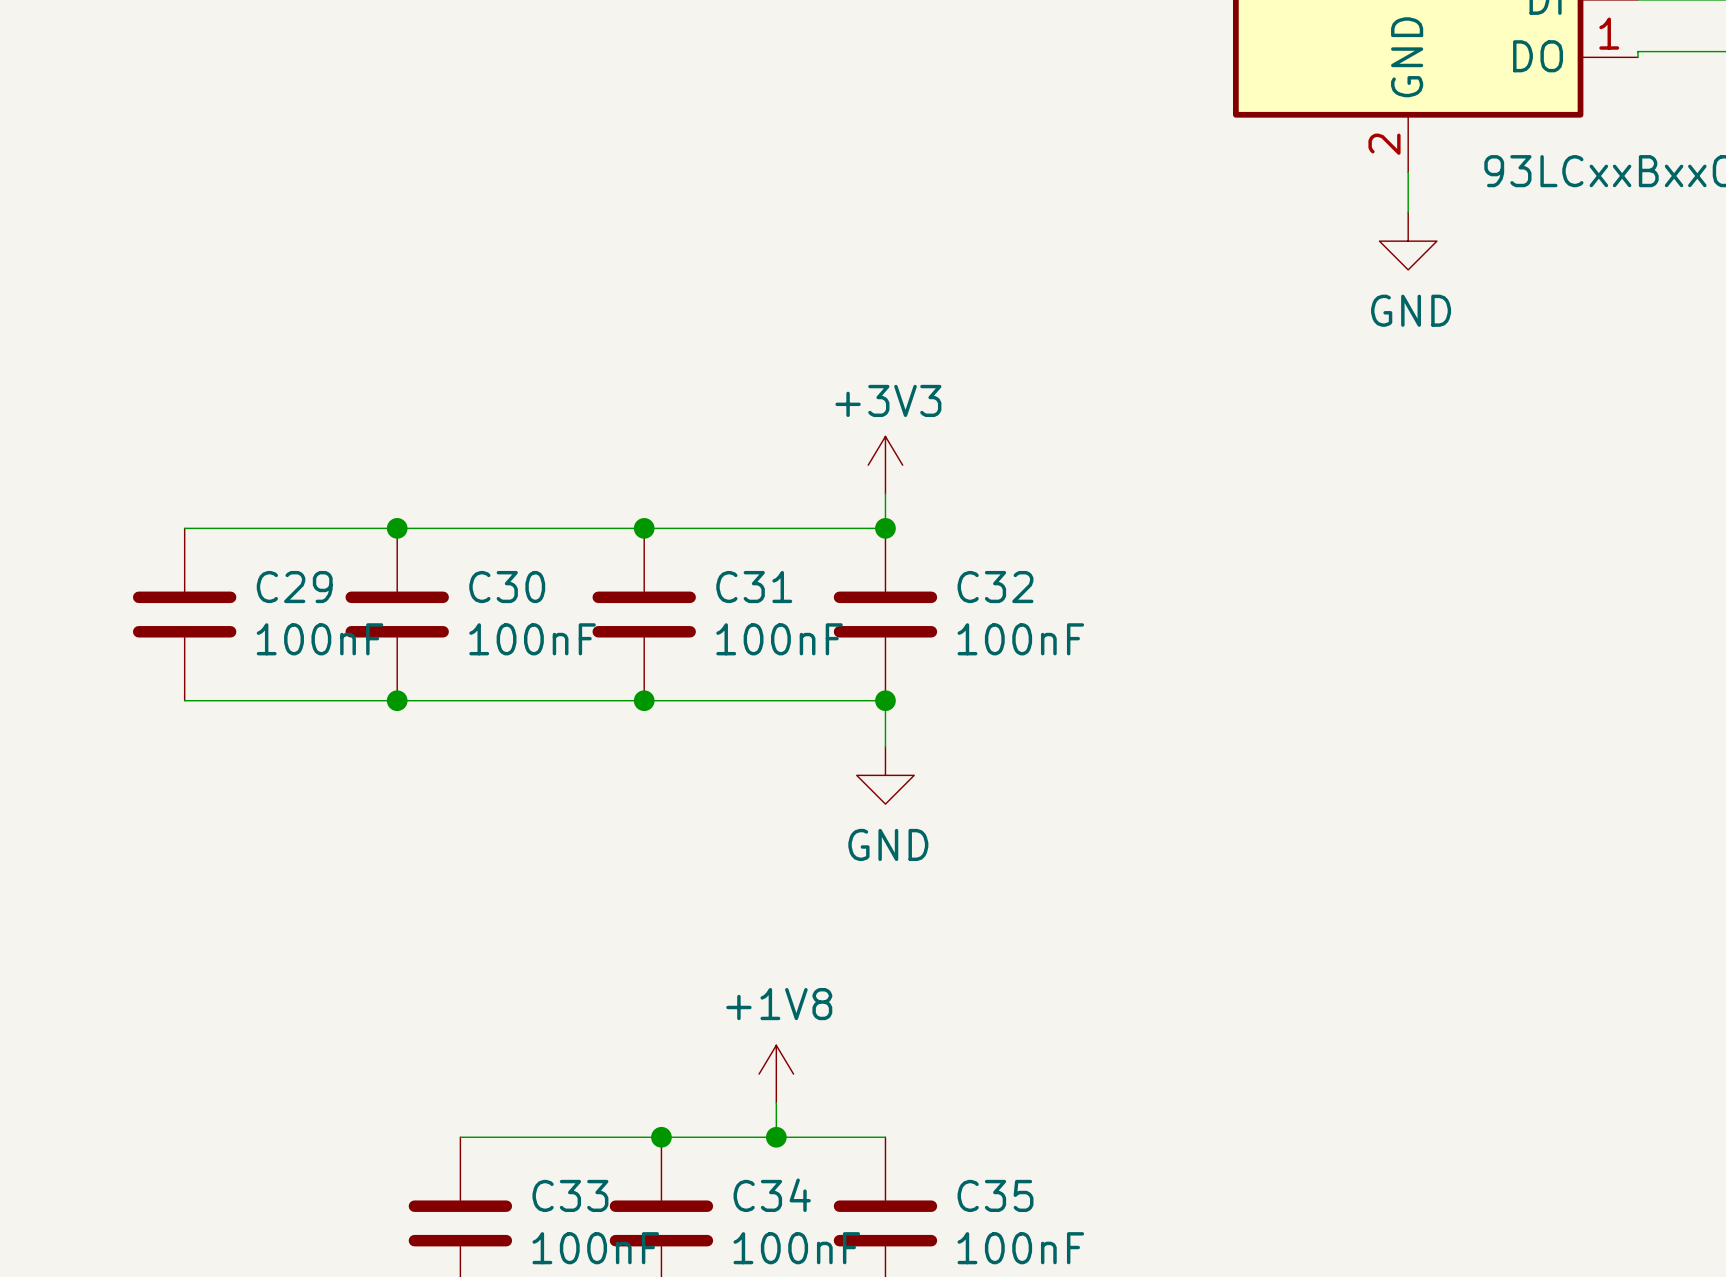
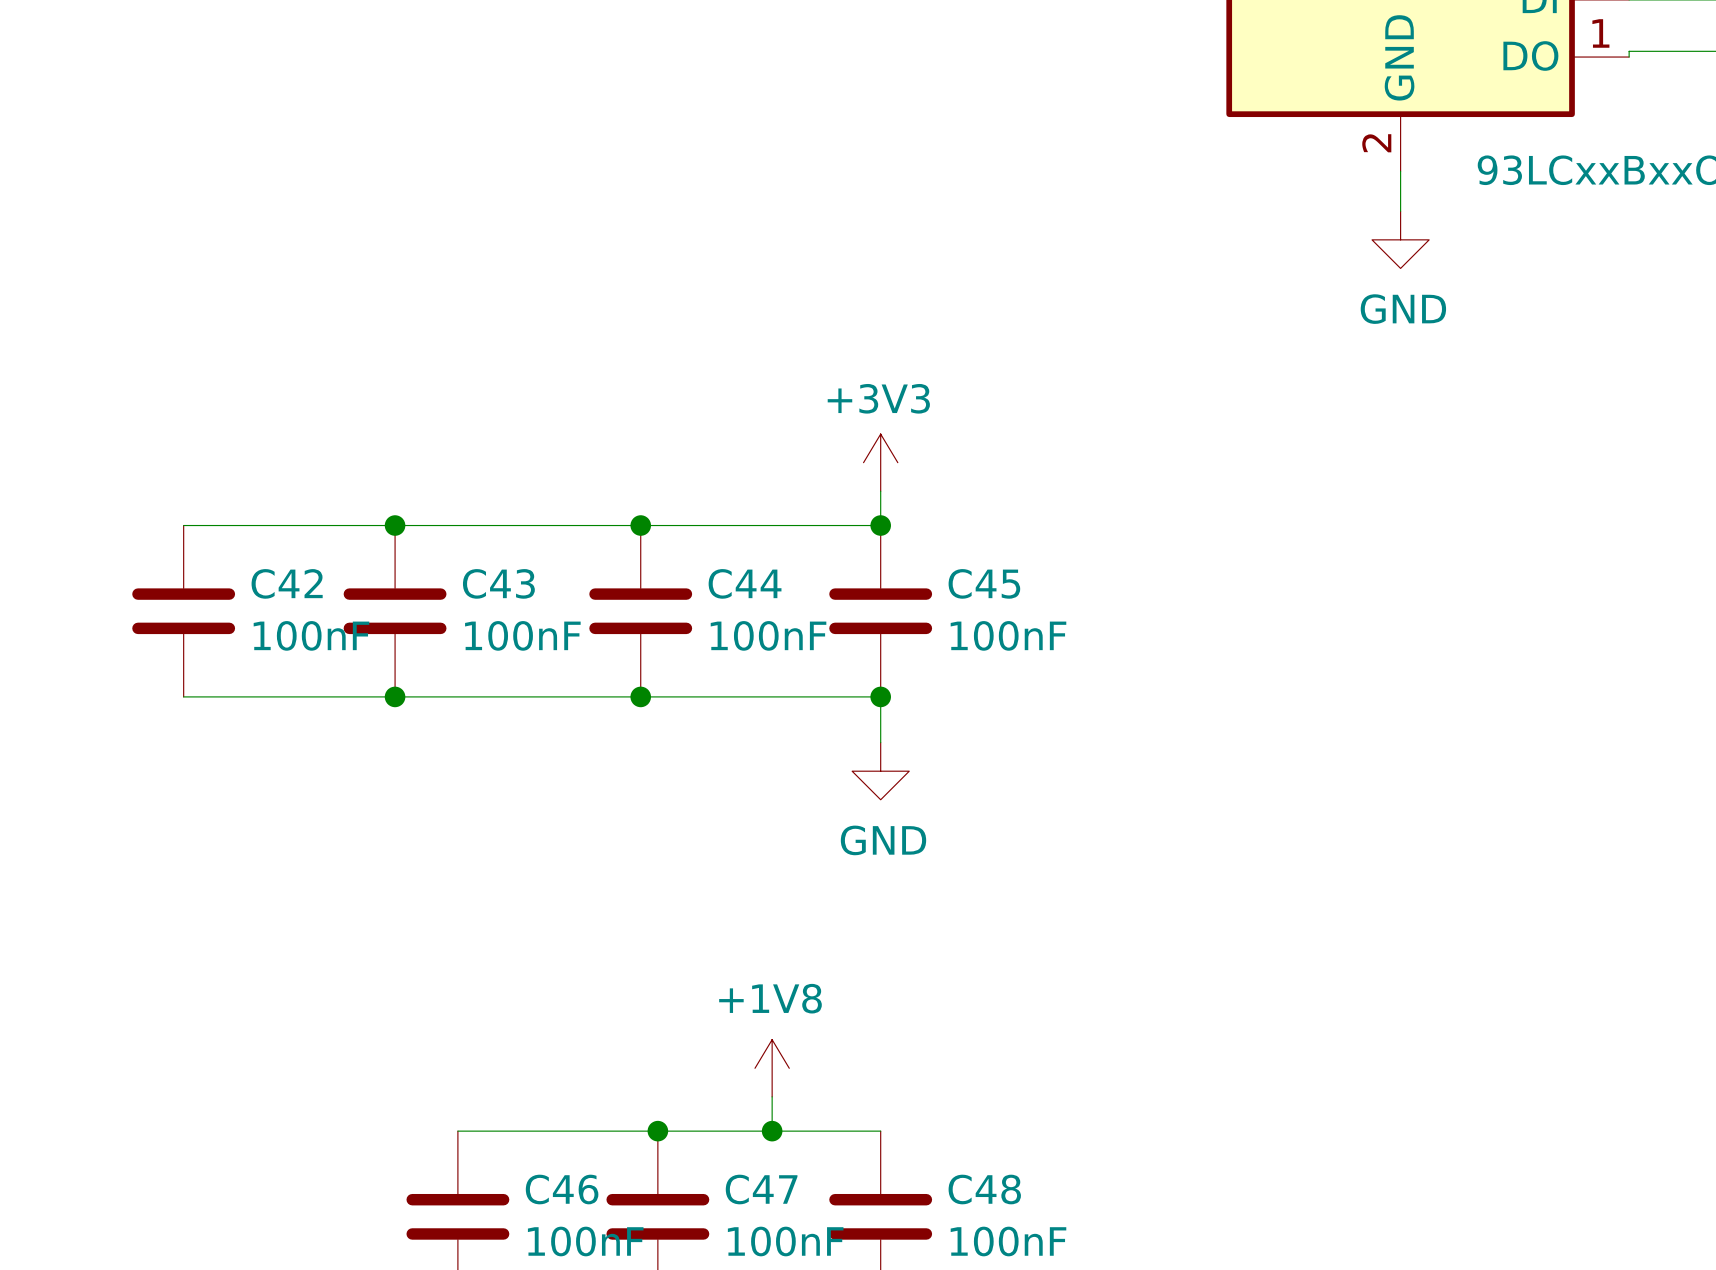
C29 name: C29 (294, 587) -> C42 (287, 583)
C30 name: C30 (507, 587) -> C43 (498, 583)
C31 name: C31 (754, 587) -> C44 (745, 583)
C32 name: C32 (995, 587) -> C45 (984, 583)
C33 name: C33 (570, 1195) -> C46 (562, 1189)
C34 name: C34 (772, 1195) -> C47 (761, 1189)
C35 name: C35 (995, 1195) -> C48 (984, 1189)

